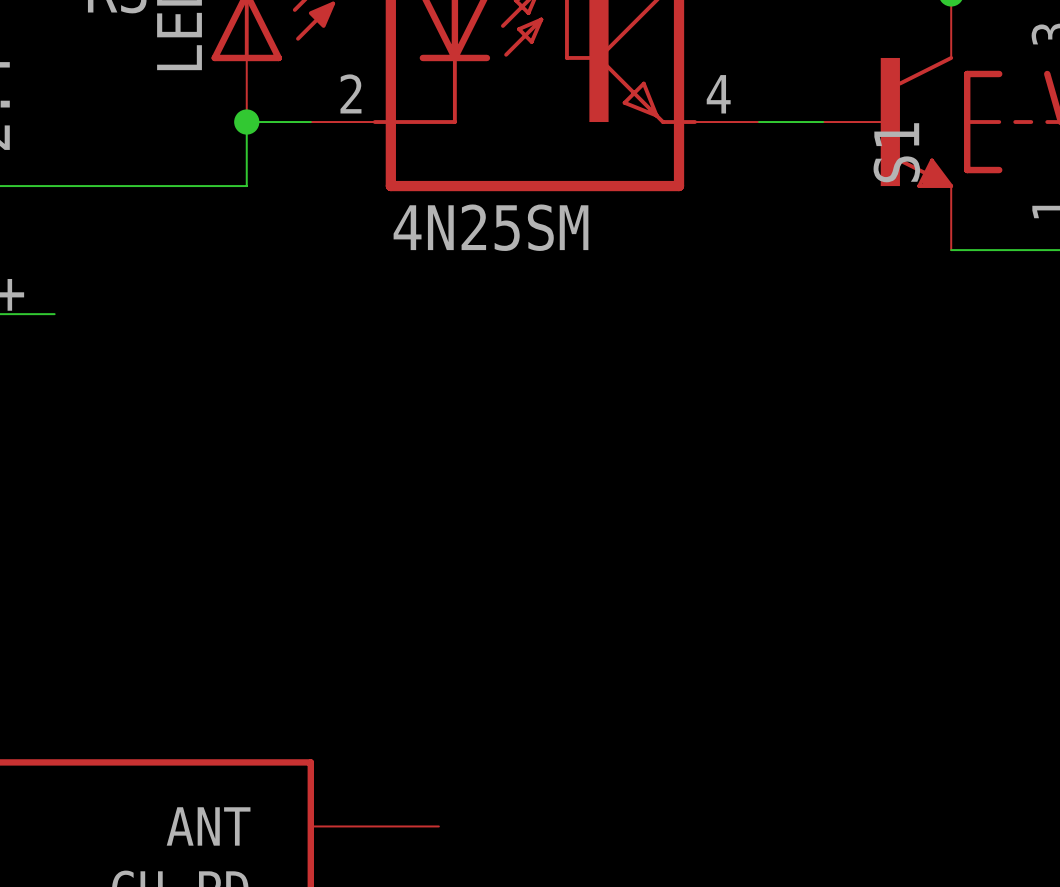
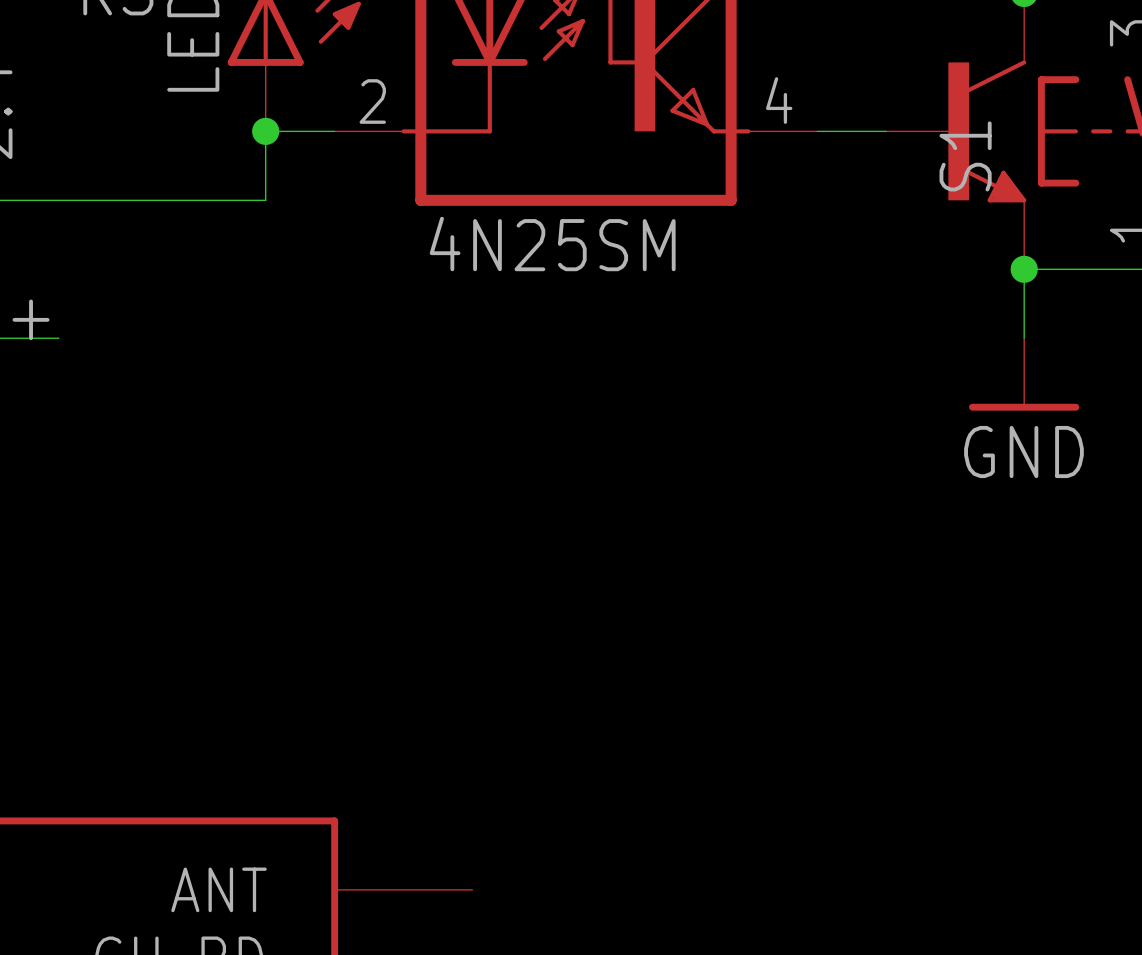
wire: none -> (1024, 269) (1024, 338)
junction: none -> (1024, 269)
power symbol: none -> GND (1024, 374)

